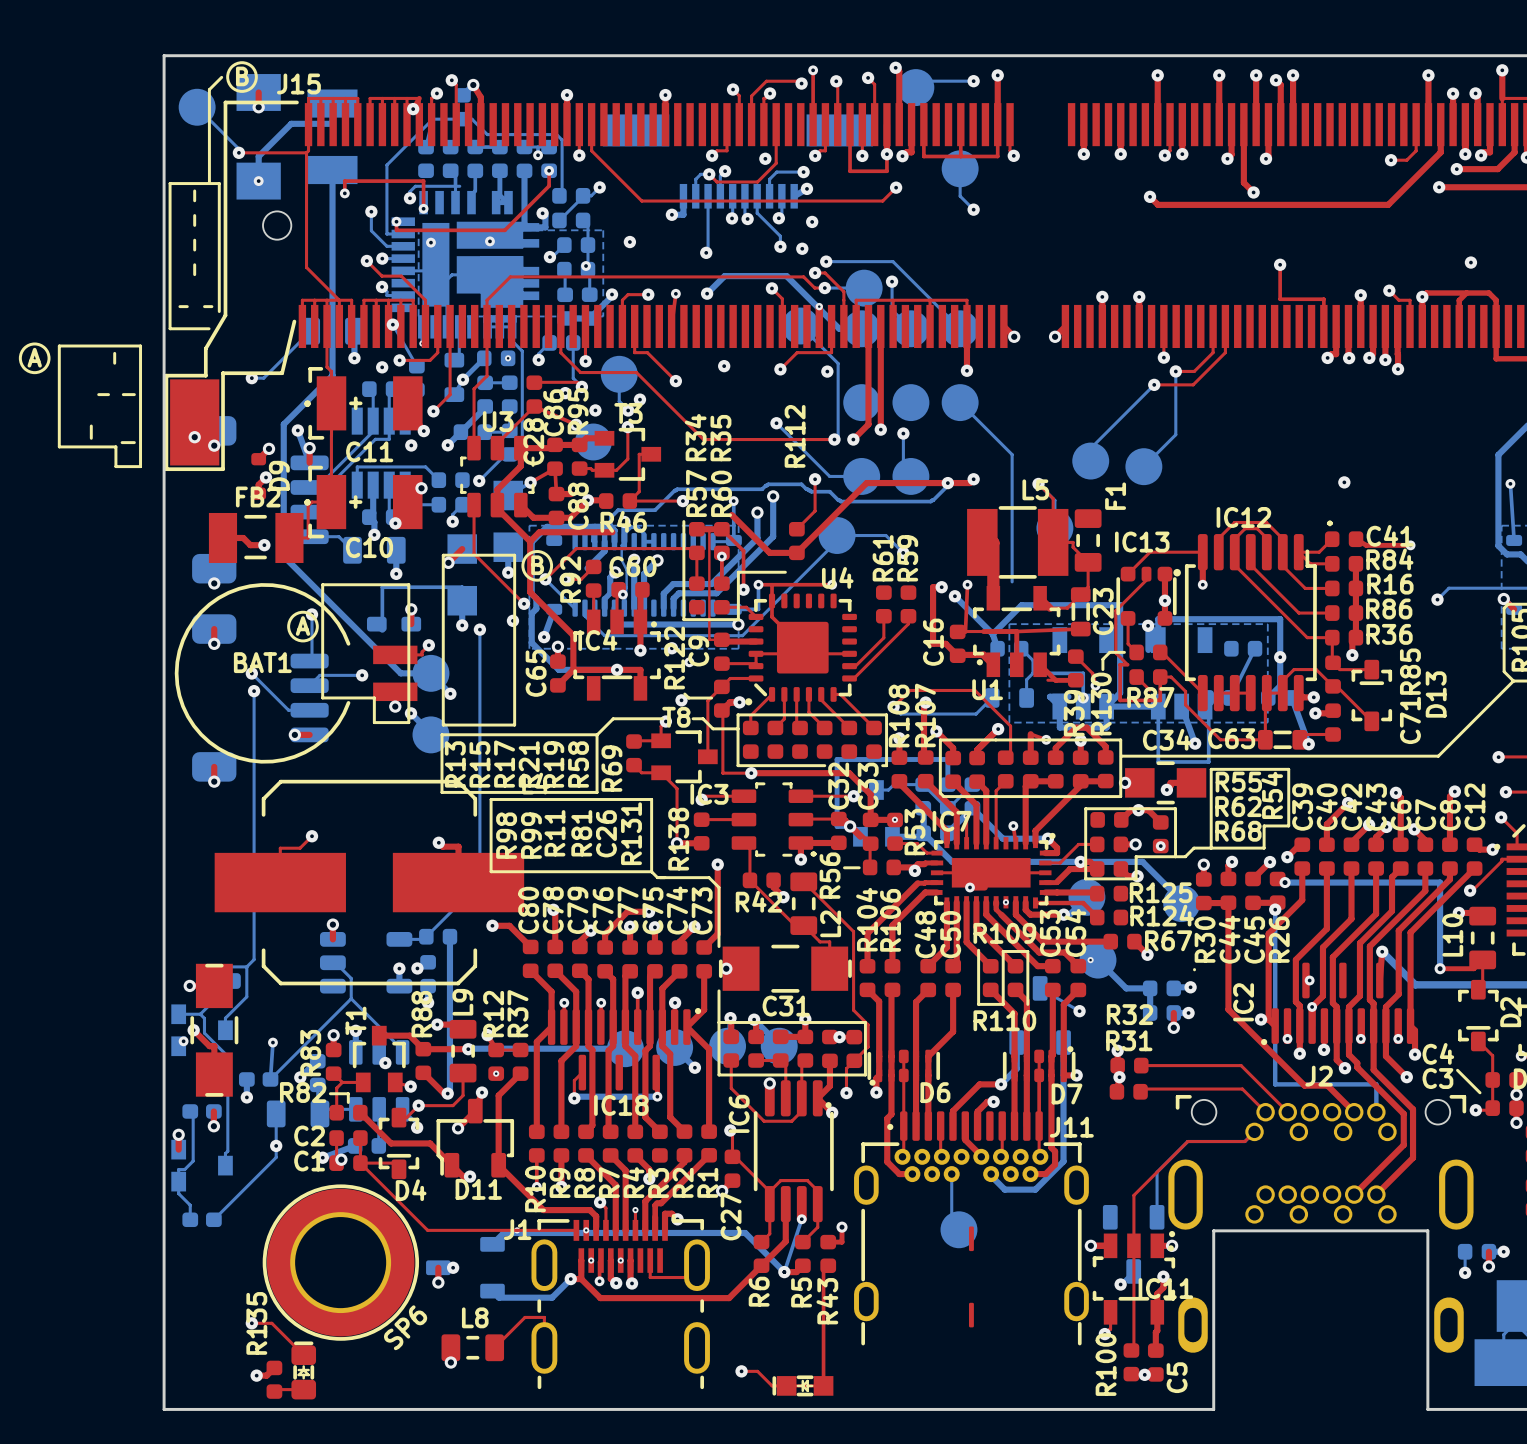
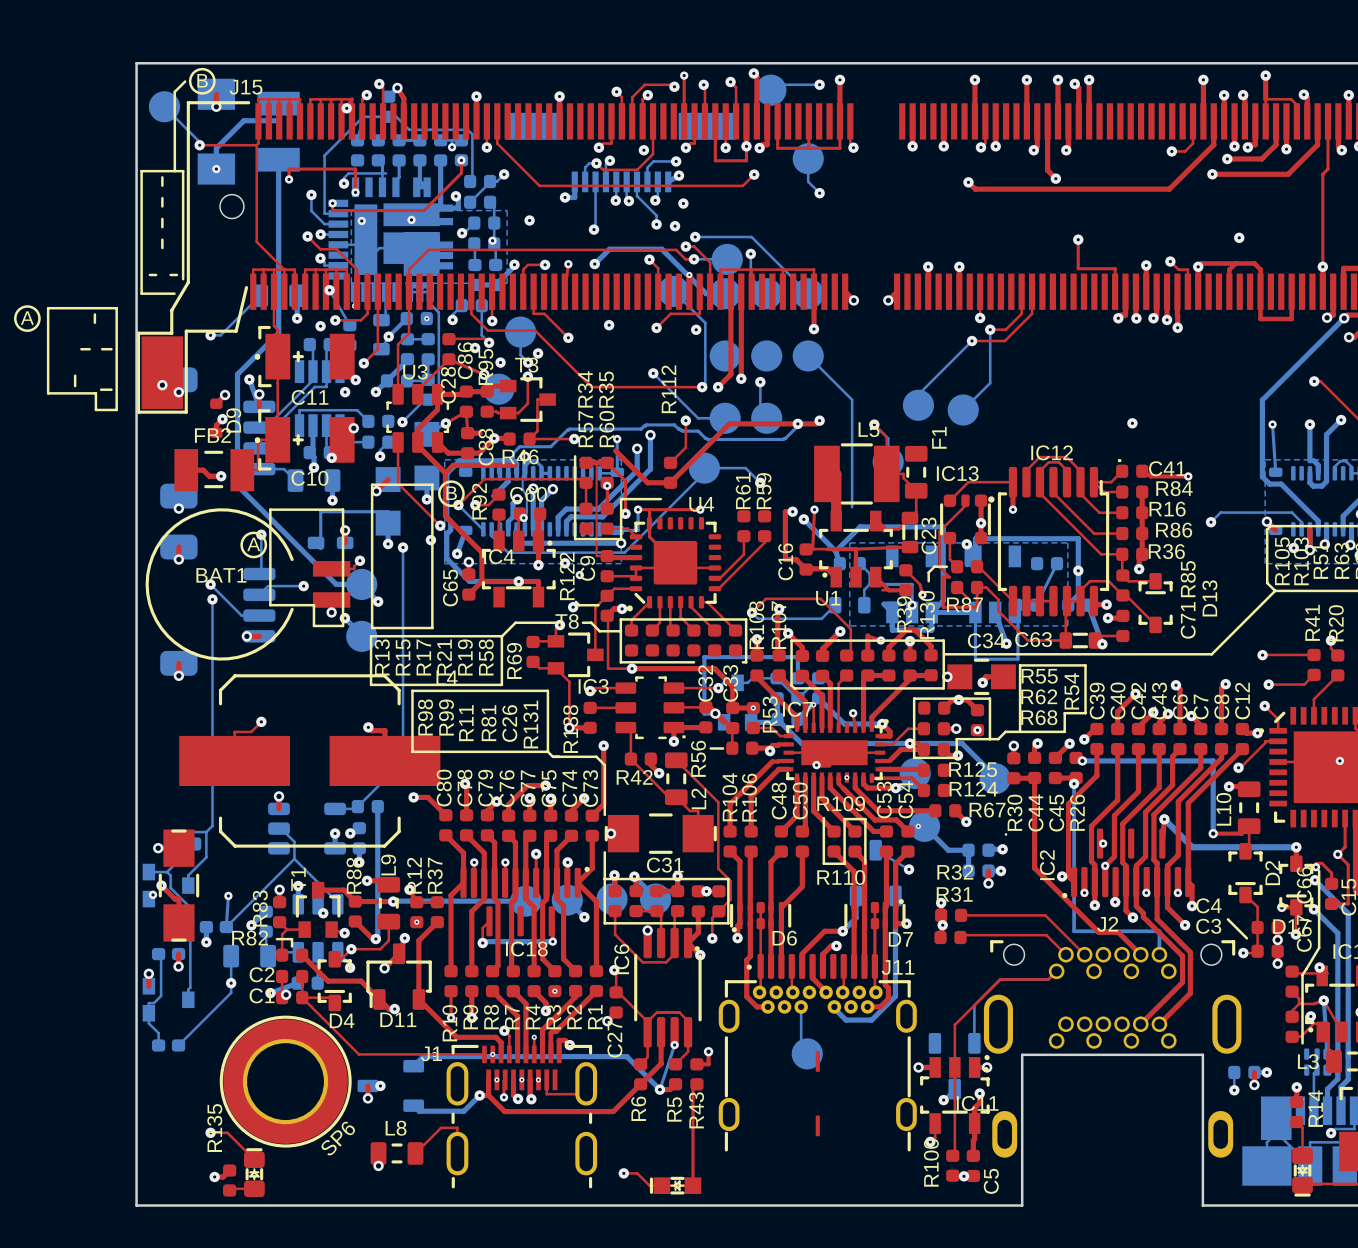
via: none -> (554, 991)
via: none -> (538, 1079)

